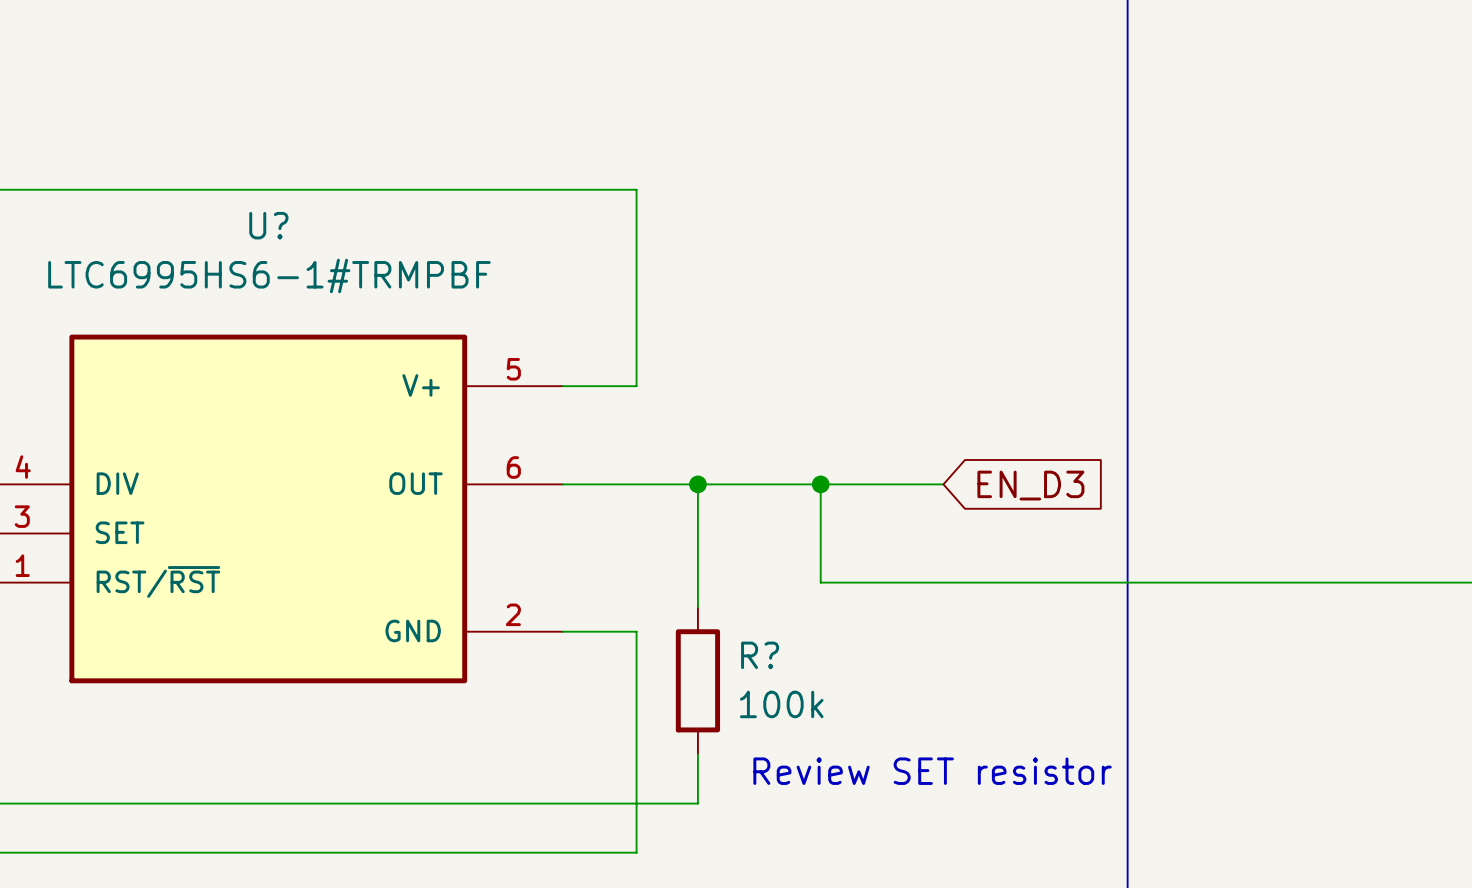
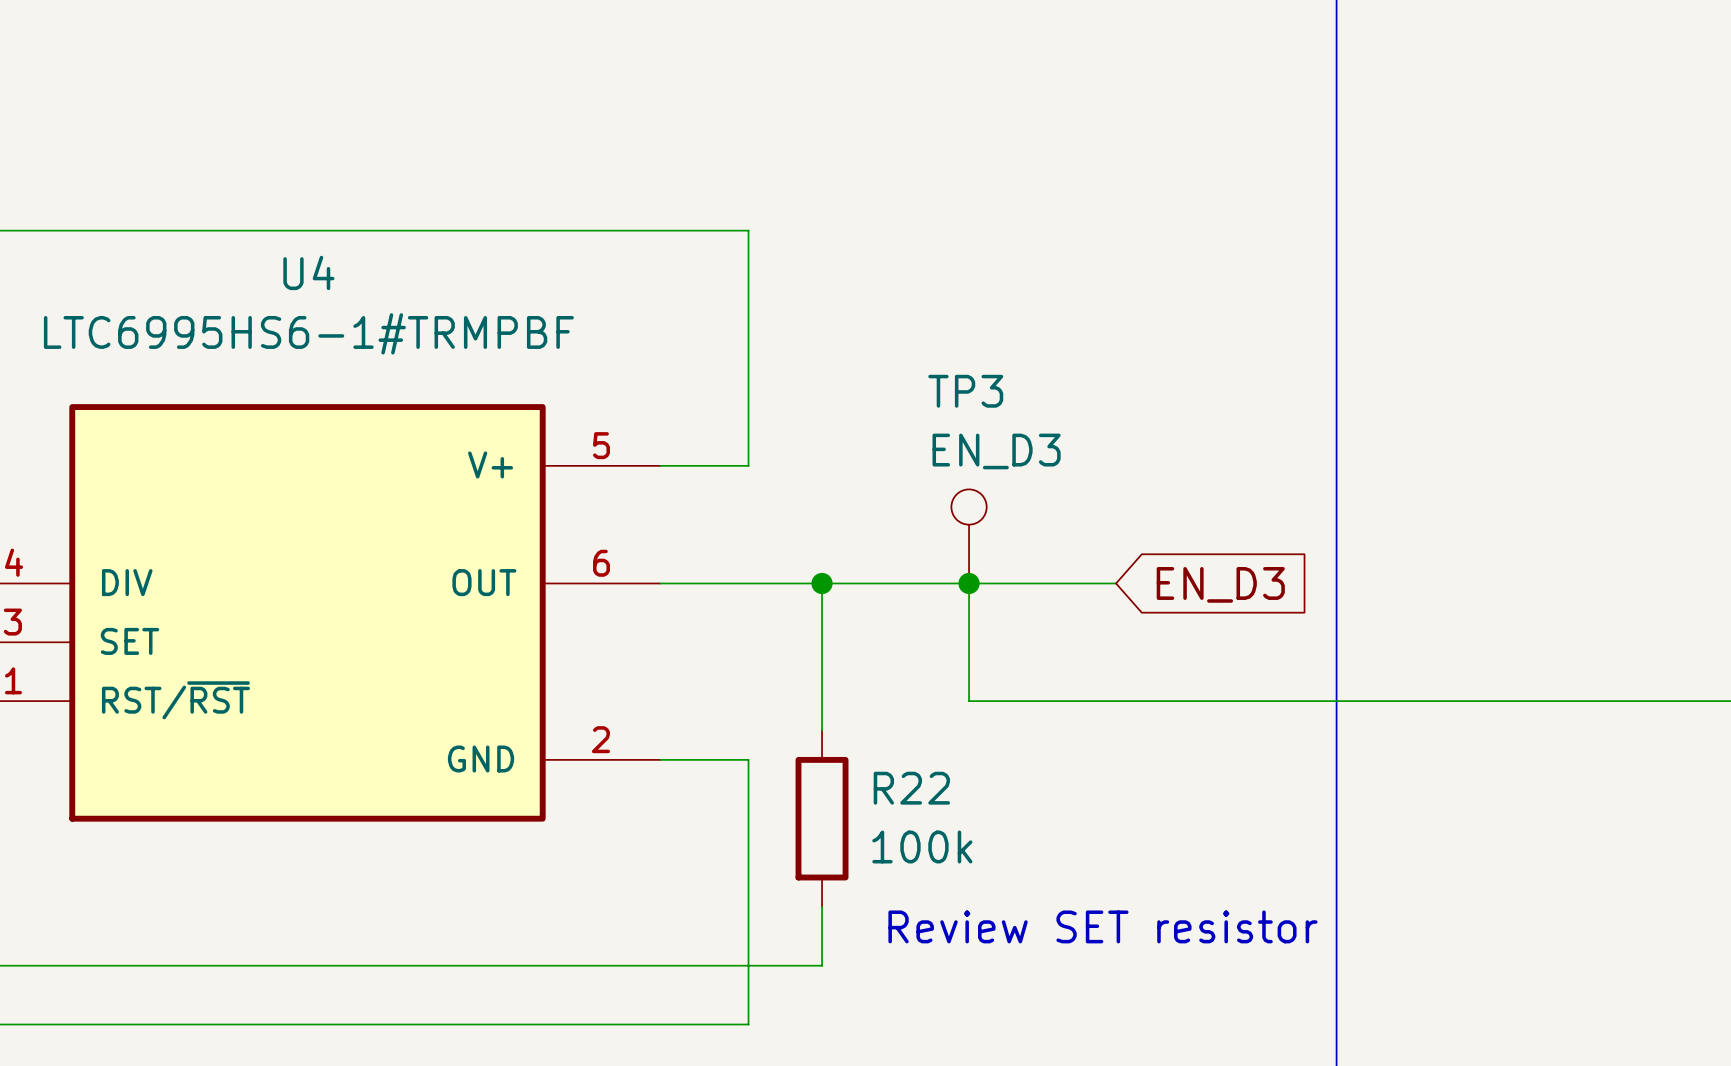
U? name: U? (268, 225) -> U4 (308, 272)
TP3: none -> EN_D3 (969, 536)
R? name: R? (760, 655) -> R22 (911, 788)

